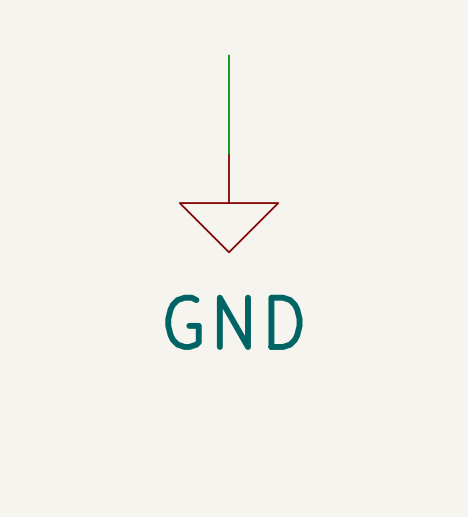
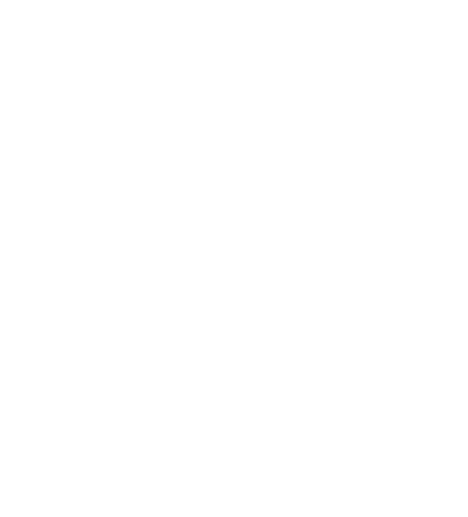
wire: (228, 55) (228, 153) -> none
power symbol: GND (228, 203) -> none

